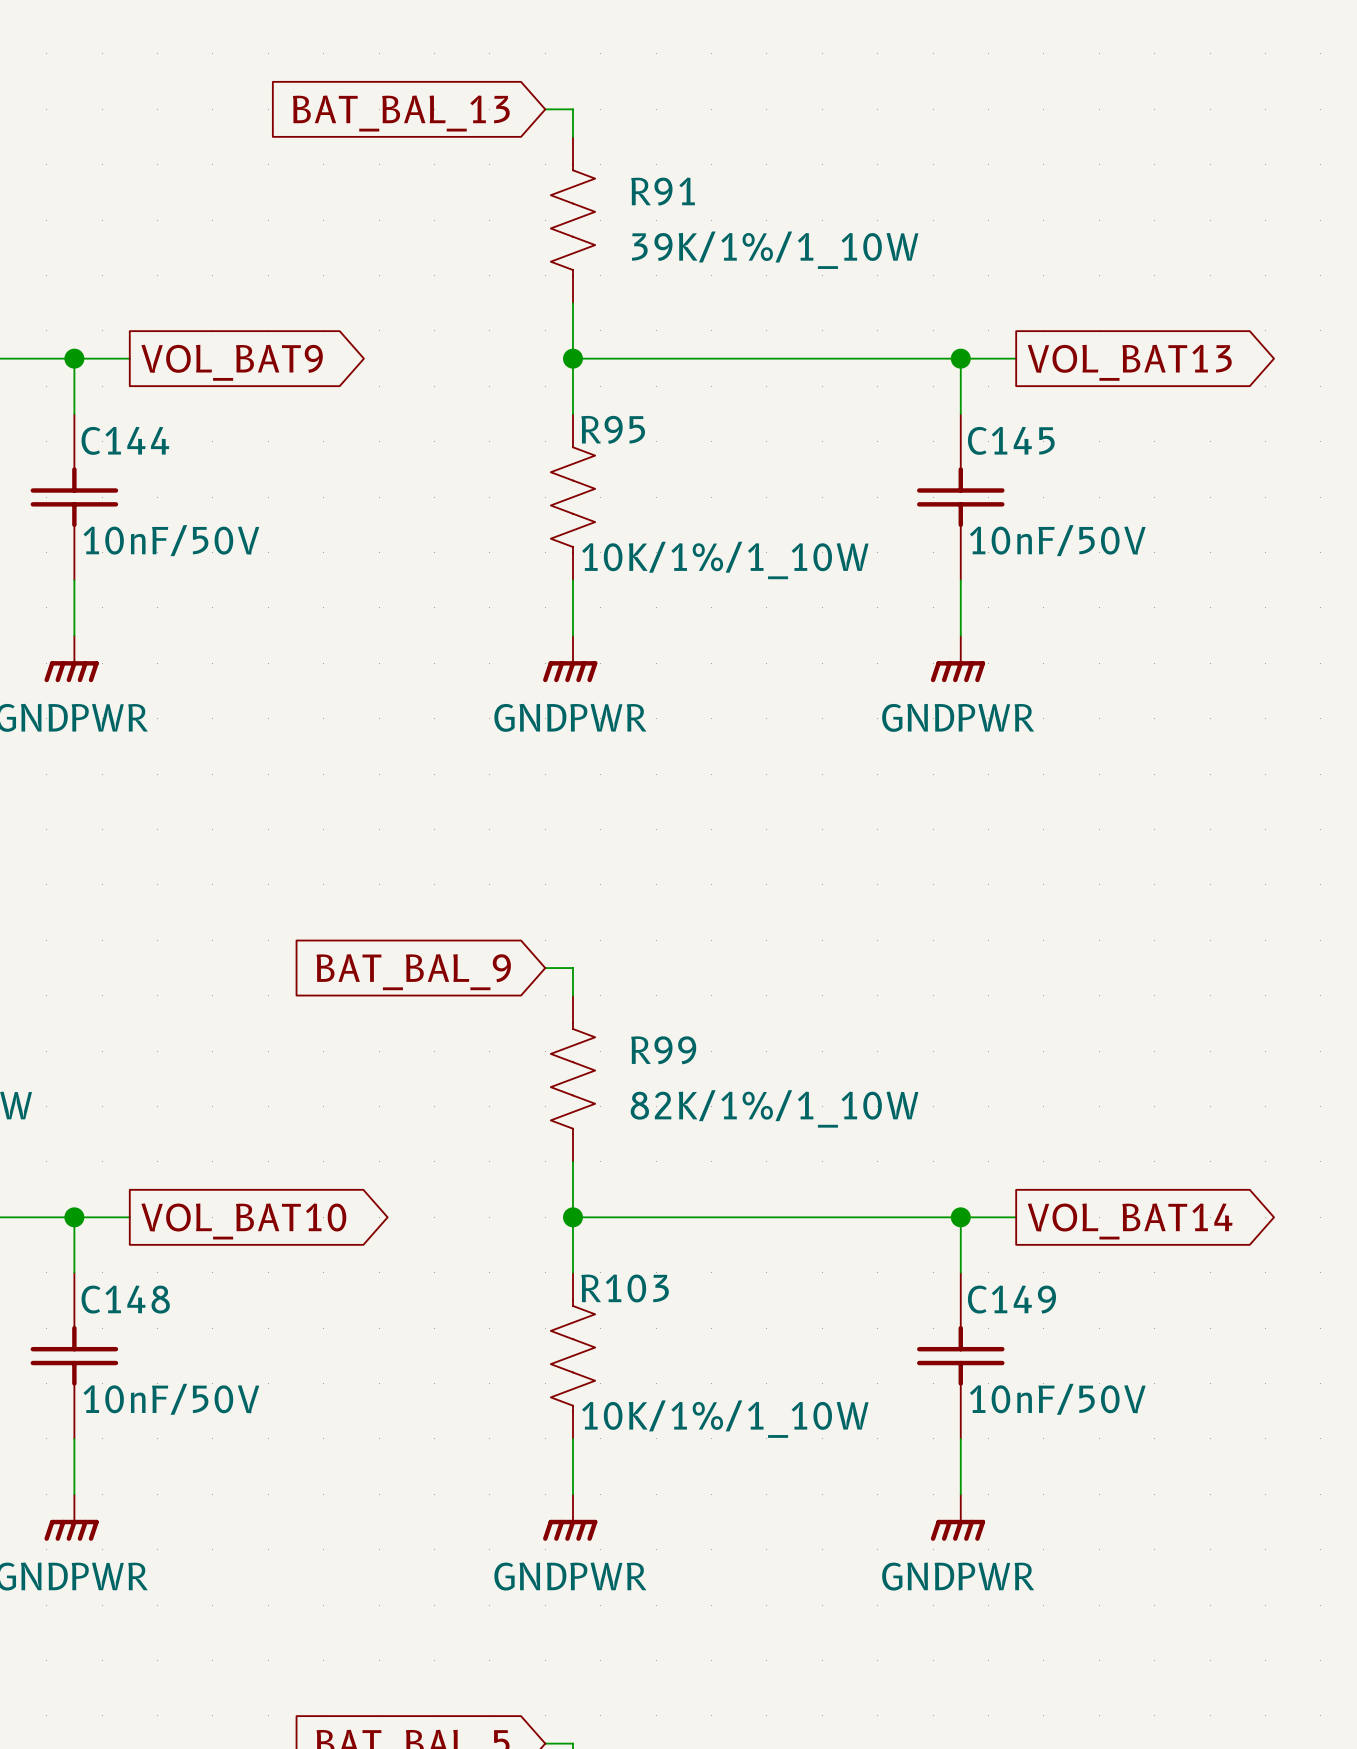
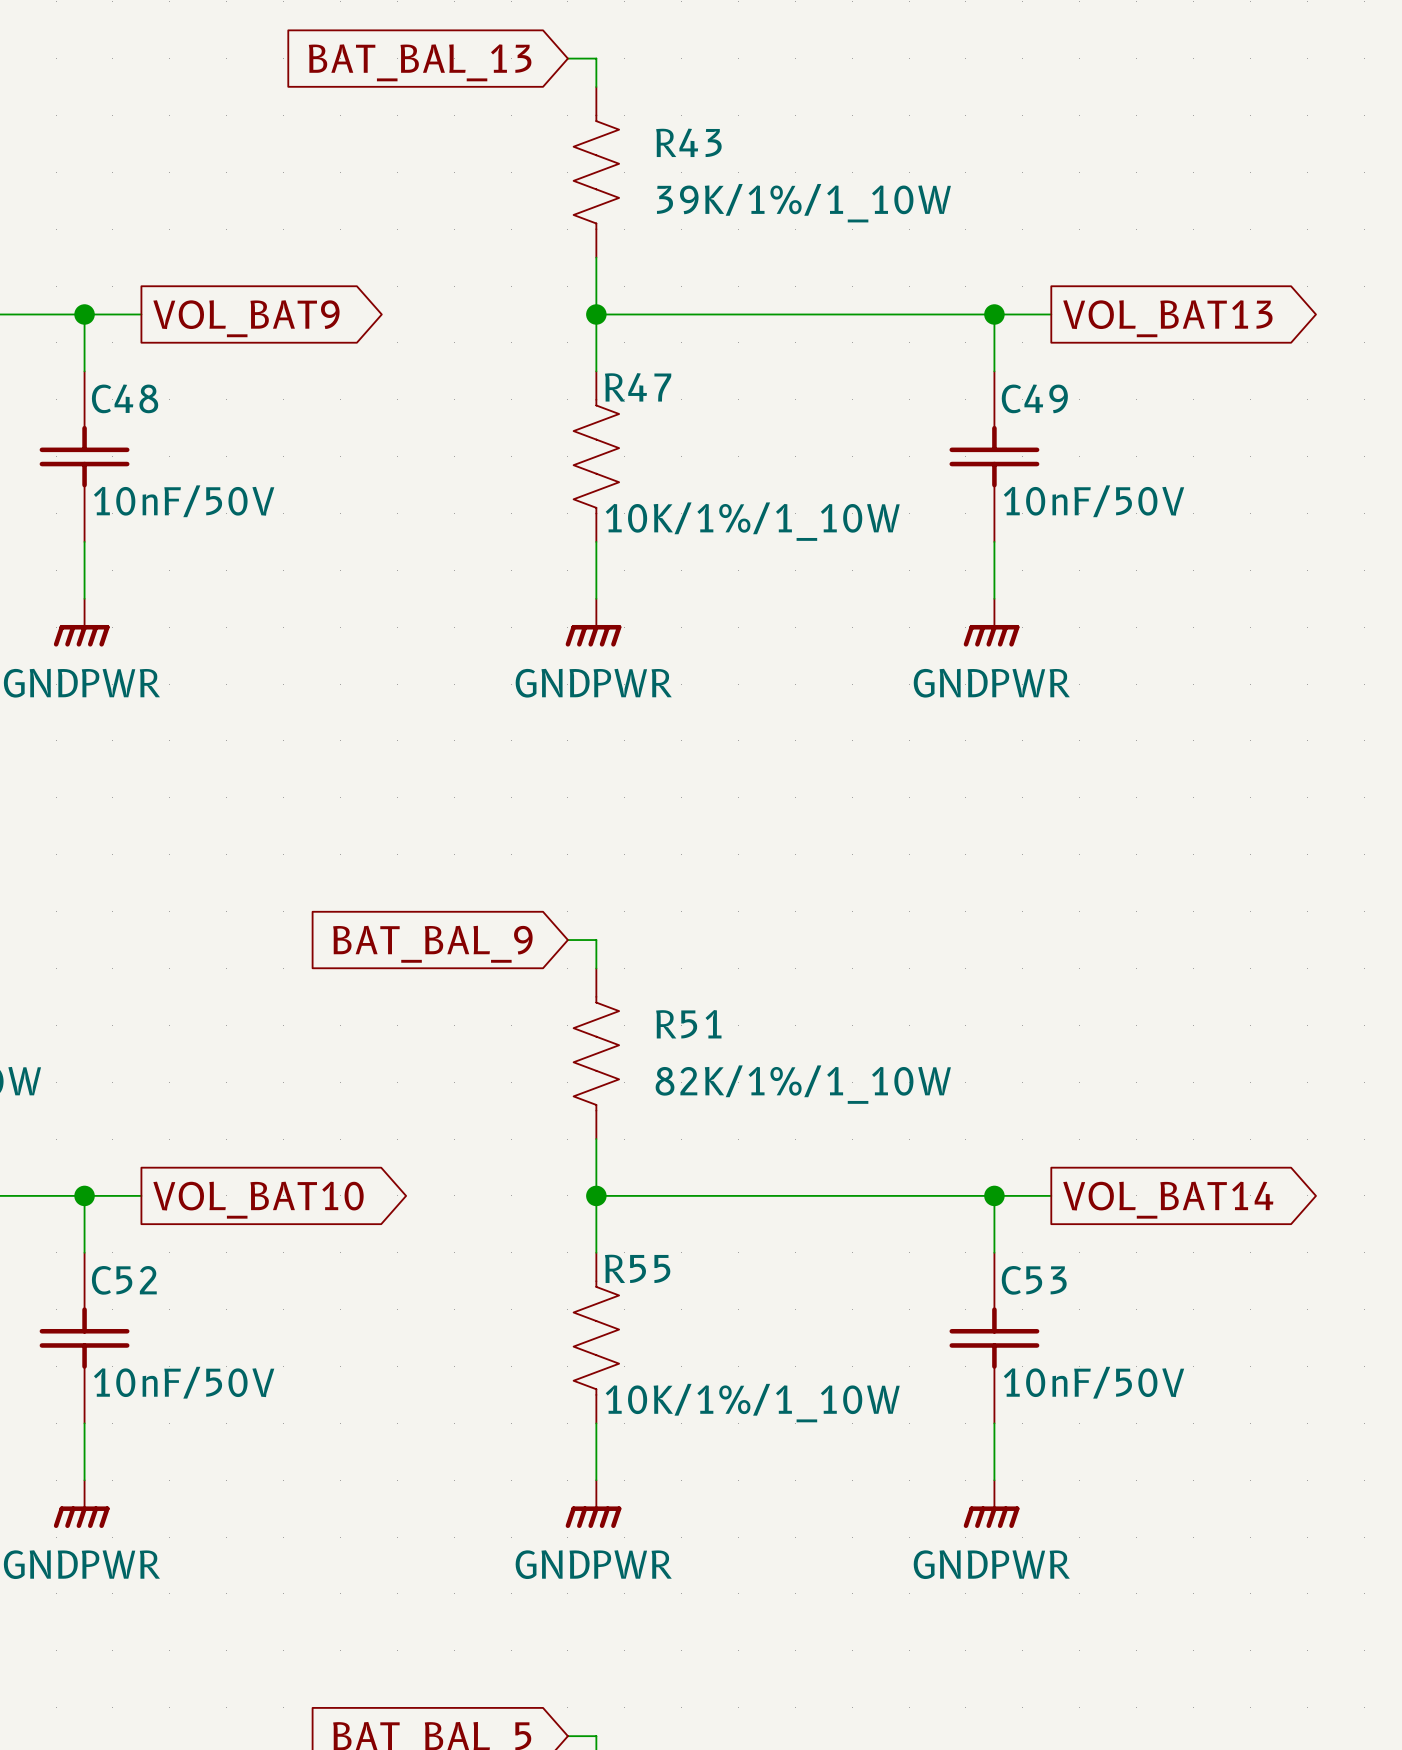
R91 name: R91 (663, 191) -> R43 (688, 142)
R95 name: R95 (613, 429) -> R47 (638, 387)
C144 name: C144 (125, 440) -> C48 (125, 398)
C145 name: C145 (1011, 440) -> C49 (1034, 398)
R99 name: R99 (663, 1050) -> R51 (688, 1024)
R103 name: R103 (625, 1288) -> R55 (637, 1268)
C148 name: C148 (125, 1299) -> C52 (124, 1280)
C149 name: C149 (1011, 1299) -> C53 (1034, 1280)

